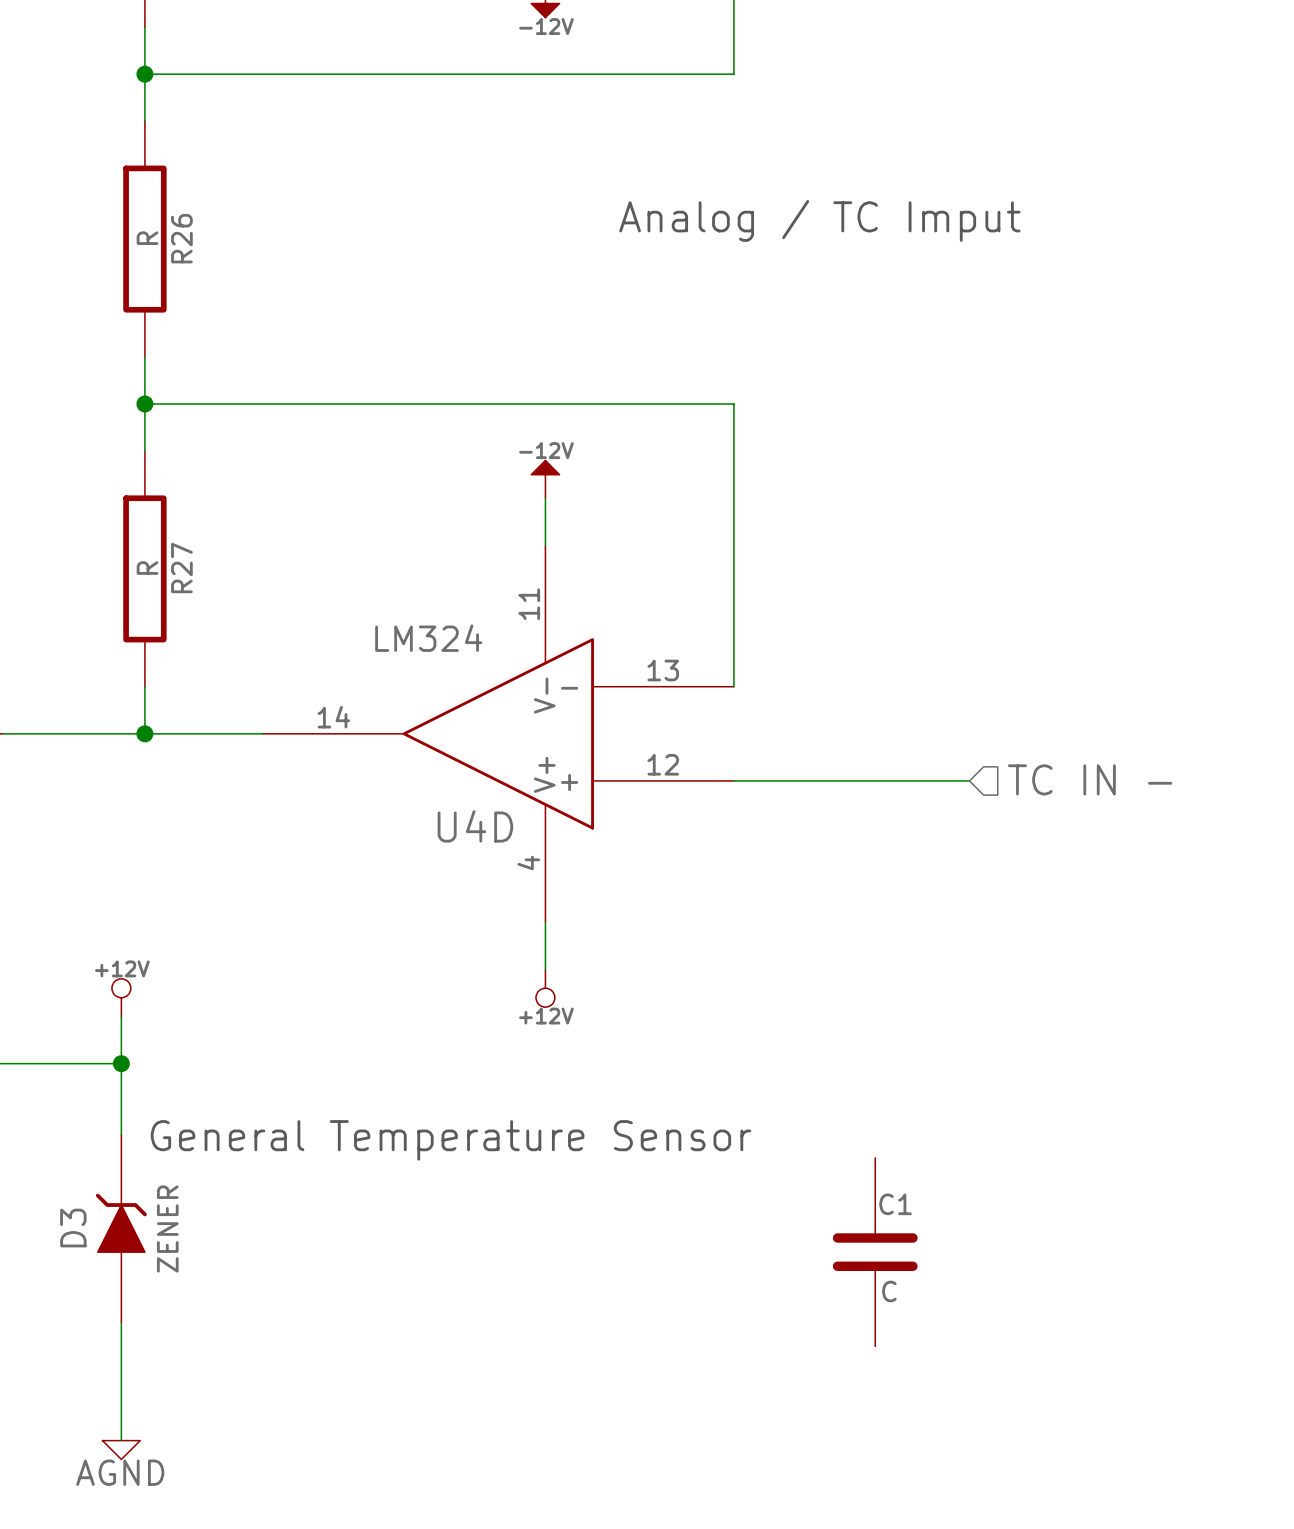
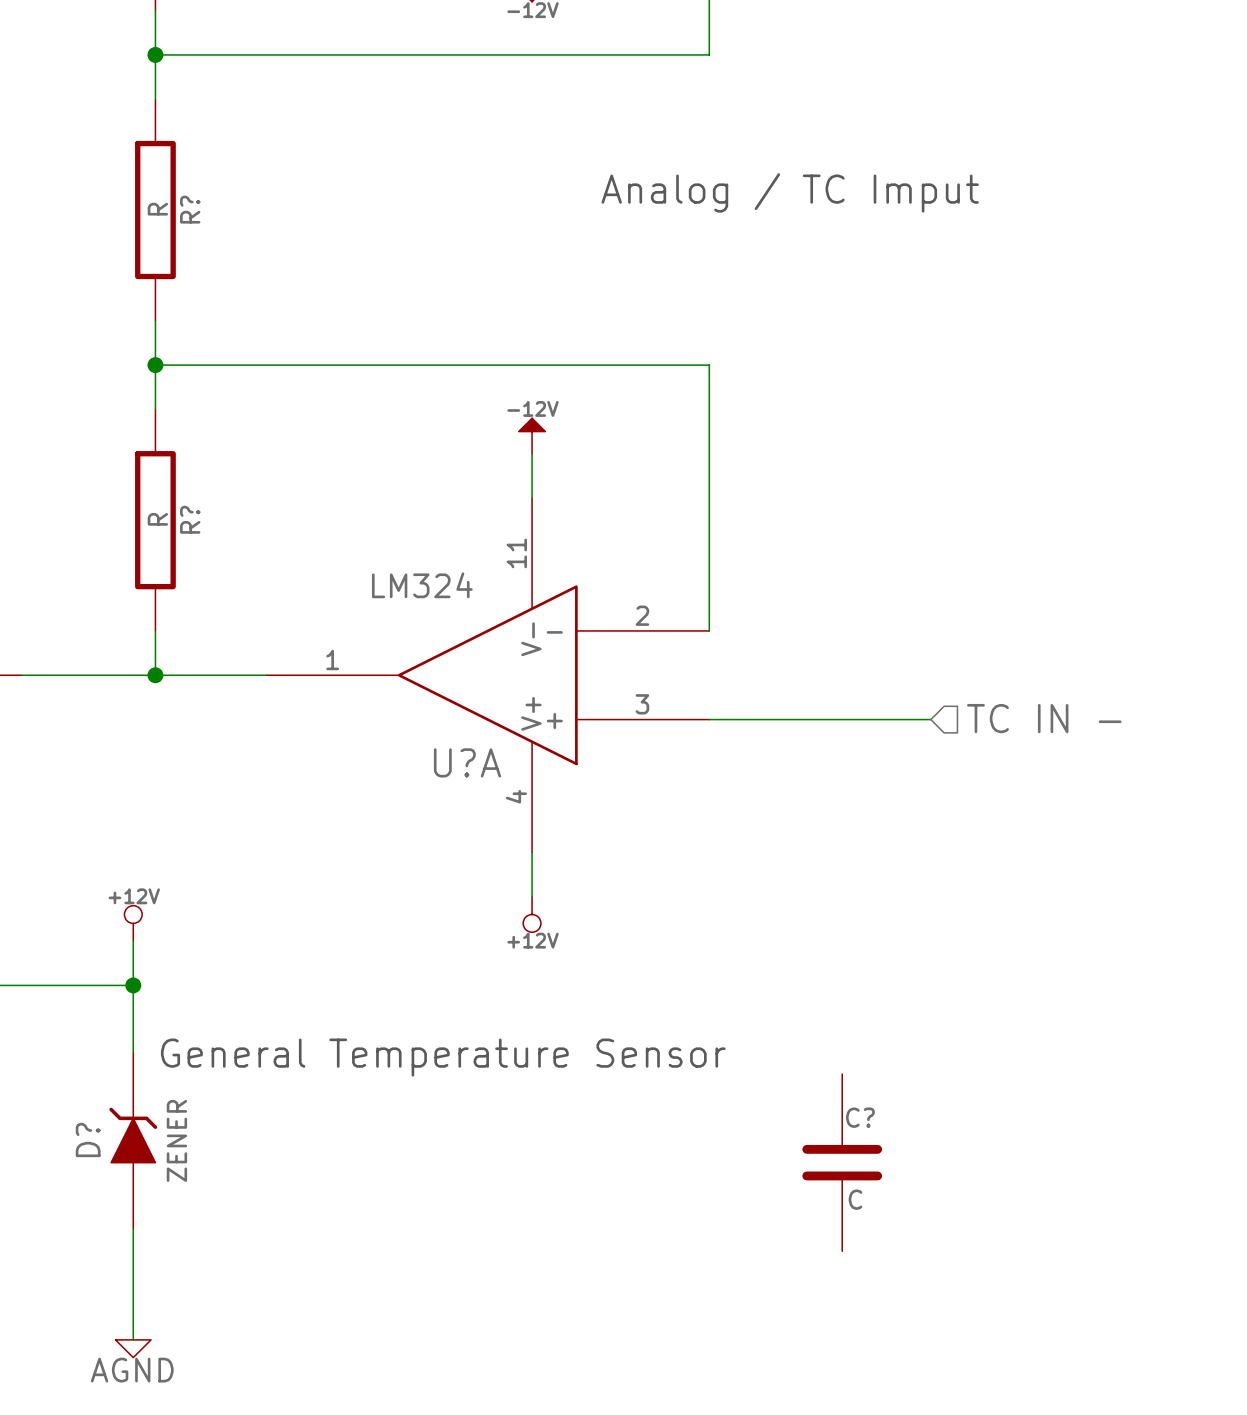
R26 name: R26 (181, 238) -> R? (190, 209)
R27 name: R27 (181, 568) -> R? (190, 519)
U4D pin number: 13 (663, 670) -> 2 (642, 615)
U4D pin number: 14 (333, 717) -> 1 (332, 660)
U4D pin number: 12 (663, 764) -> 3 (642, 704)
U4D name: U4D (475, 826) -> U?A (467, 762)
C1 name: C1 (895, 1204) -> C? (860, 1117)
D3 name: D3 (73, 1228) -> D? (88, 1139)

